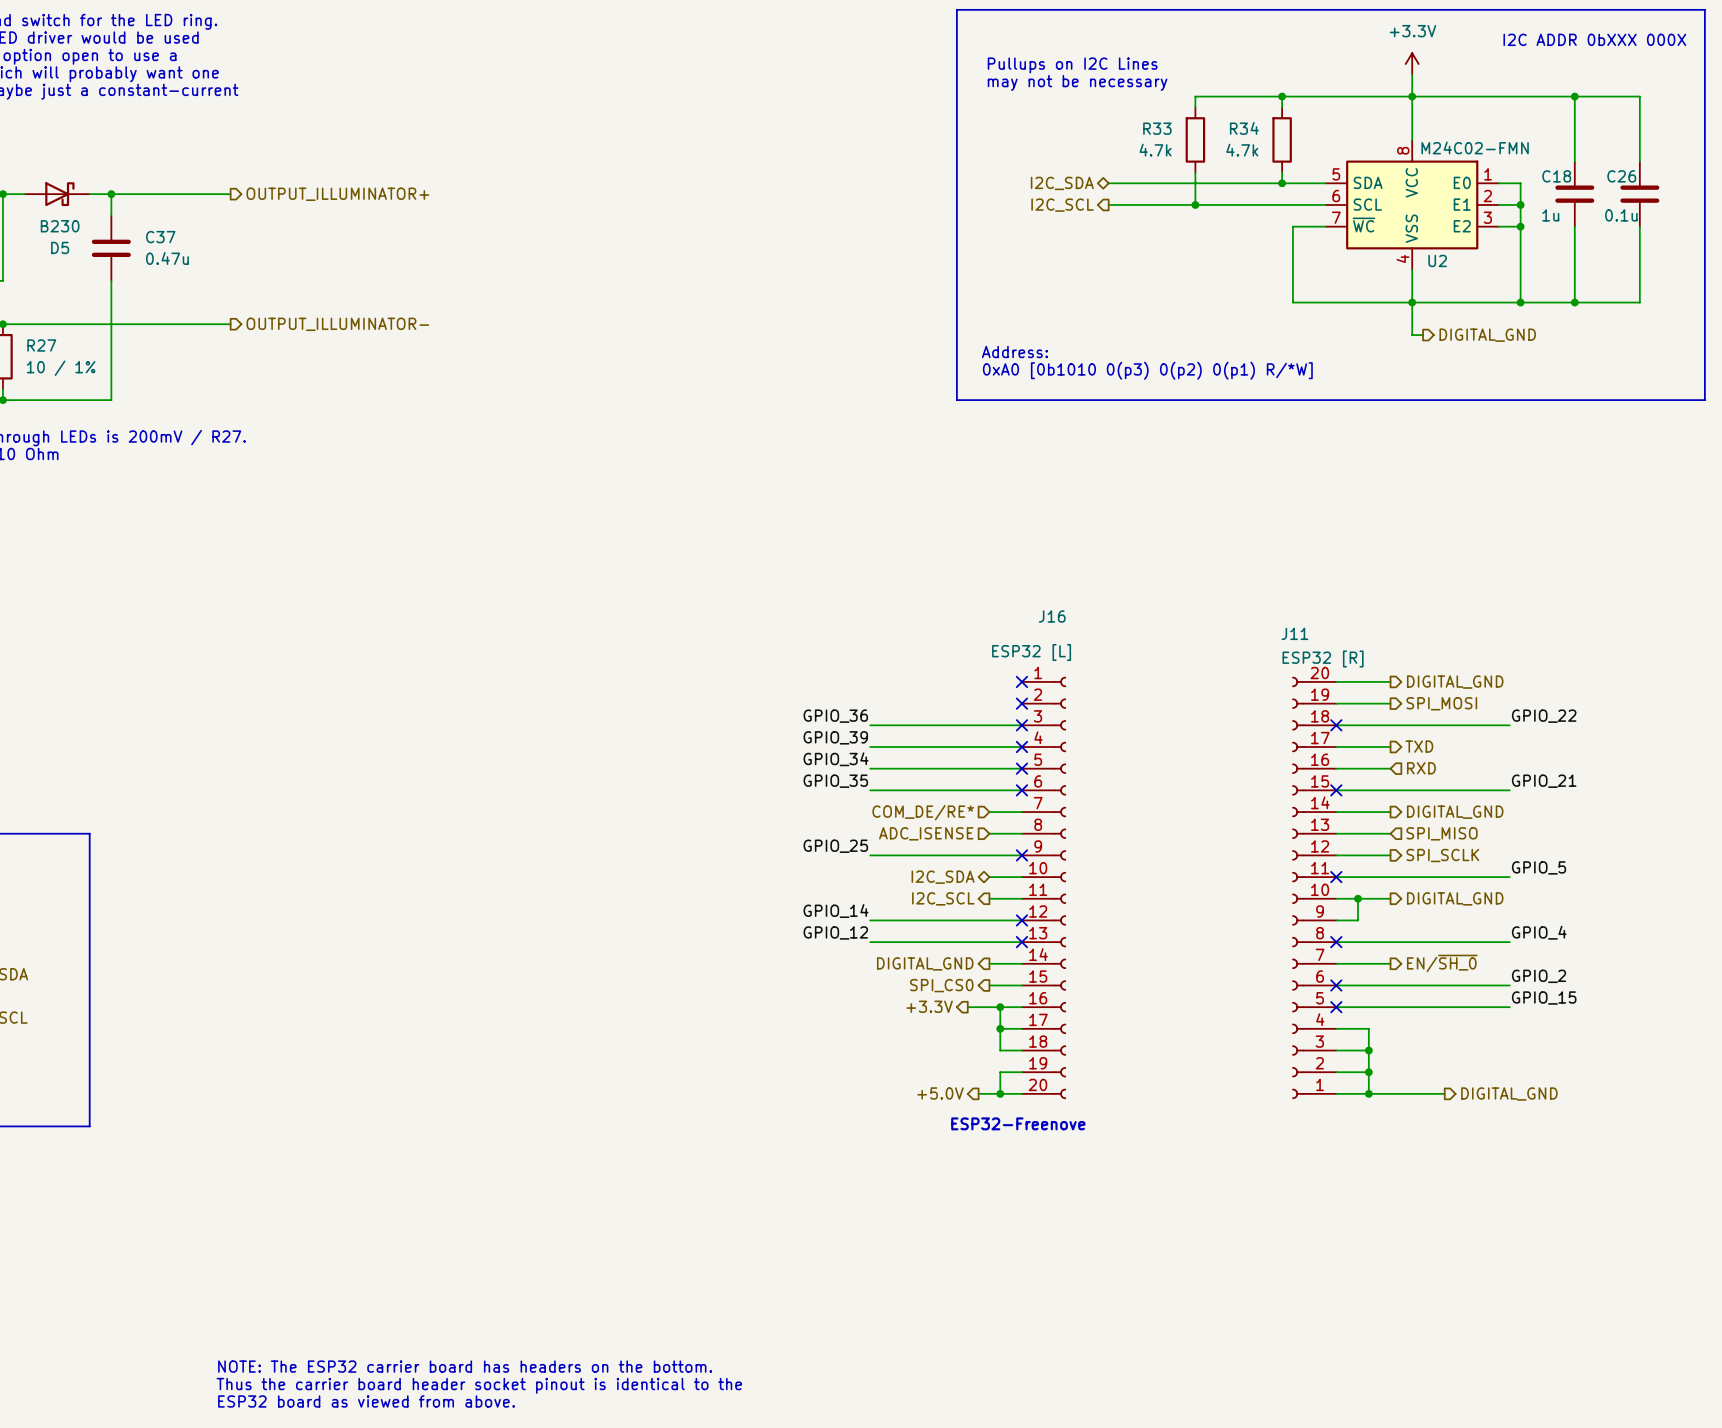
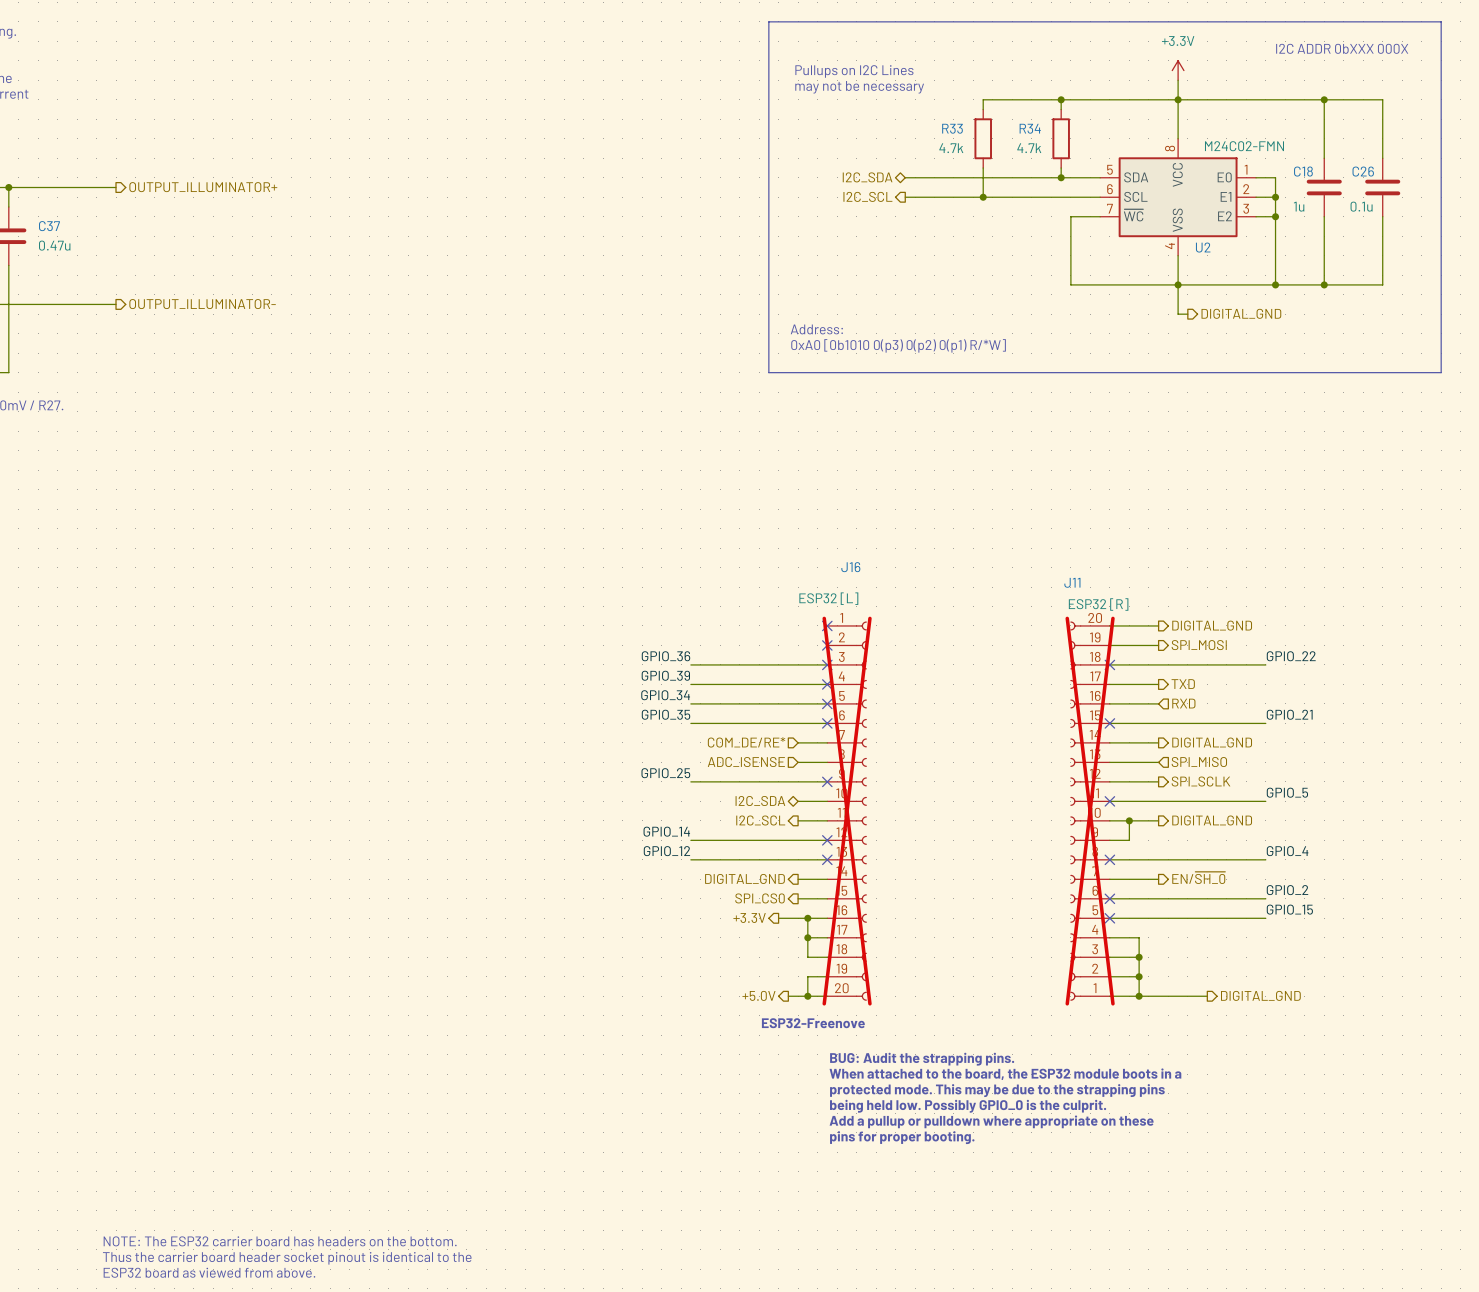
J16 do-not-place cross: none -> (847, 811)
J11 do-not-place cross: none -> (1090, 811)
text: none -> BUG: Audit the strapping pins. (922, 1059)
text: none -> When attached to the board, the ESP32 module boots in a (1005, 1074)
text: none -> protected mode. This may be due to the strapping pins (997, 1090)
text: none -> being held low. Possibly GPIO_0 is the culprit. (968, 1106)
text: none -> Add a pullup or pulldown where appropriate on these (991, 1121)
text: none -> pins for proper booting. (902, 1137)

